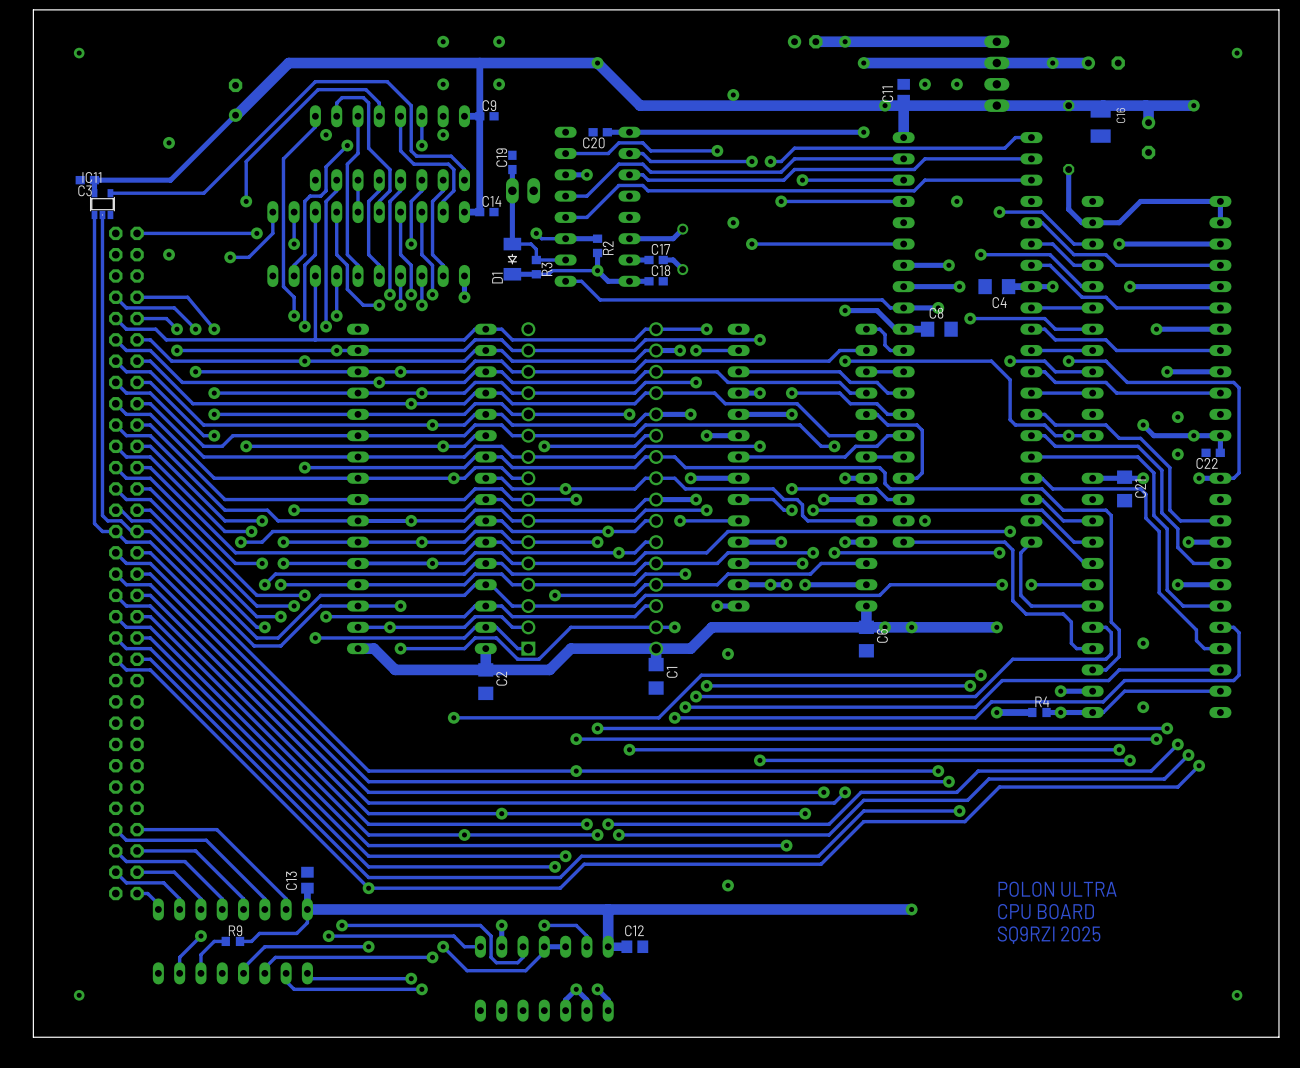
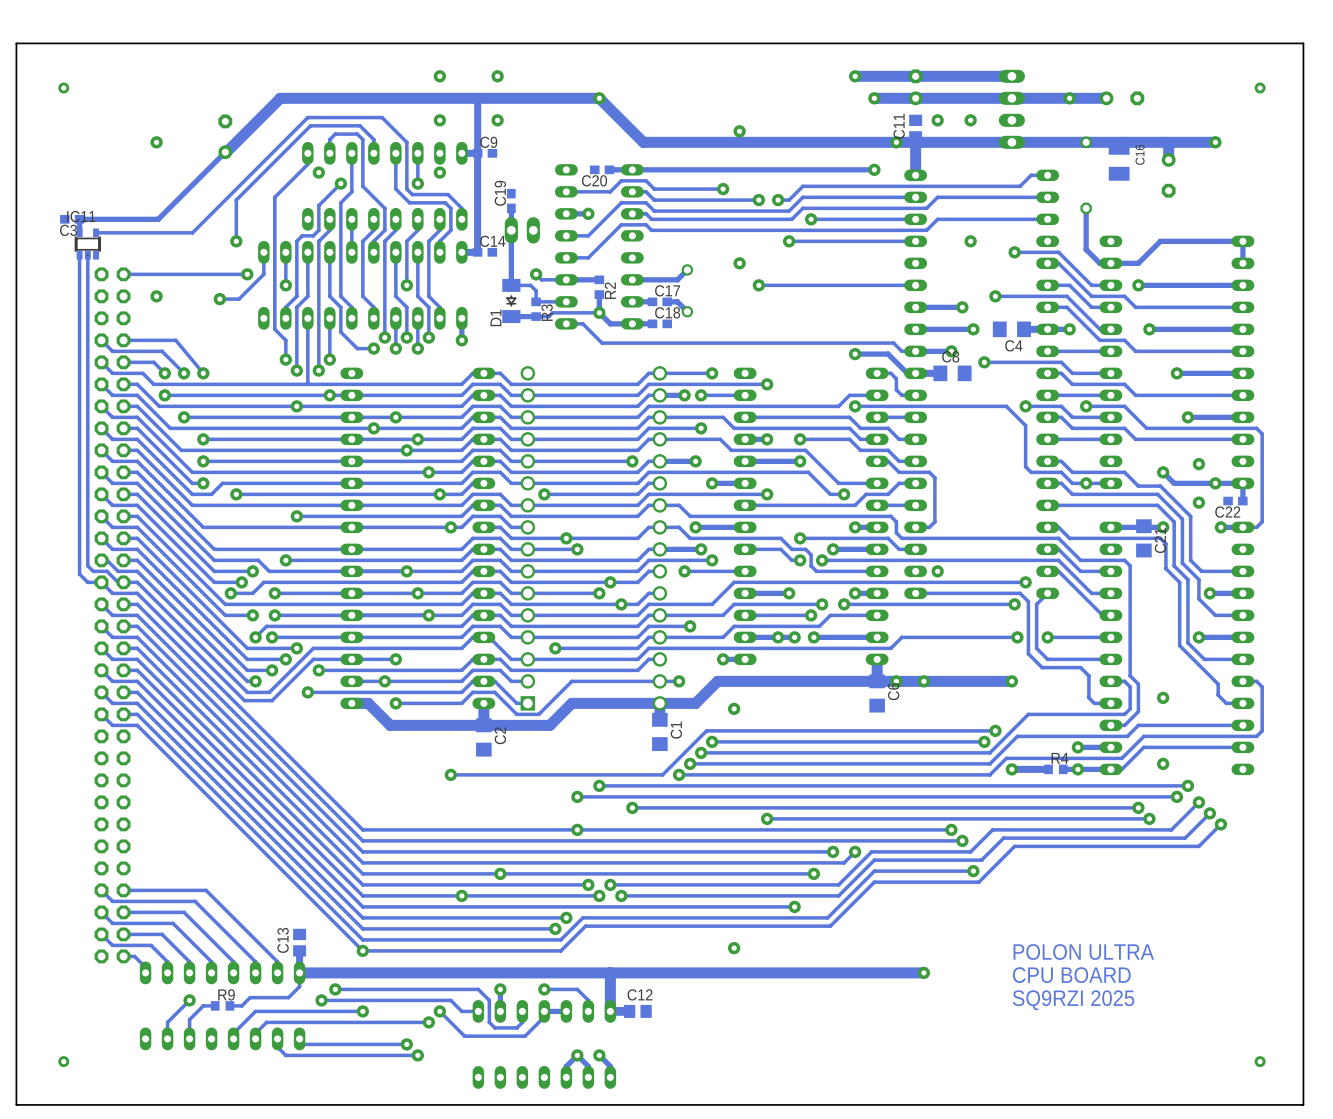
part rotation: 0° (805, 41) -> 90° counterclockwise (915, 87)
part position: (805, 41) -> (915, 87)
track: (845, 41) (815, 41) -> none
via position: (169, 142) -> (156, 142)

